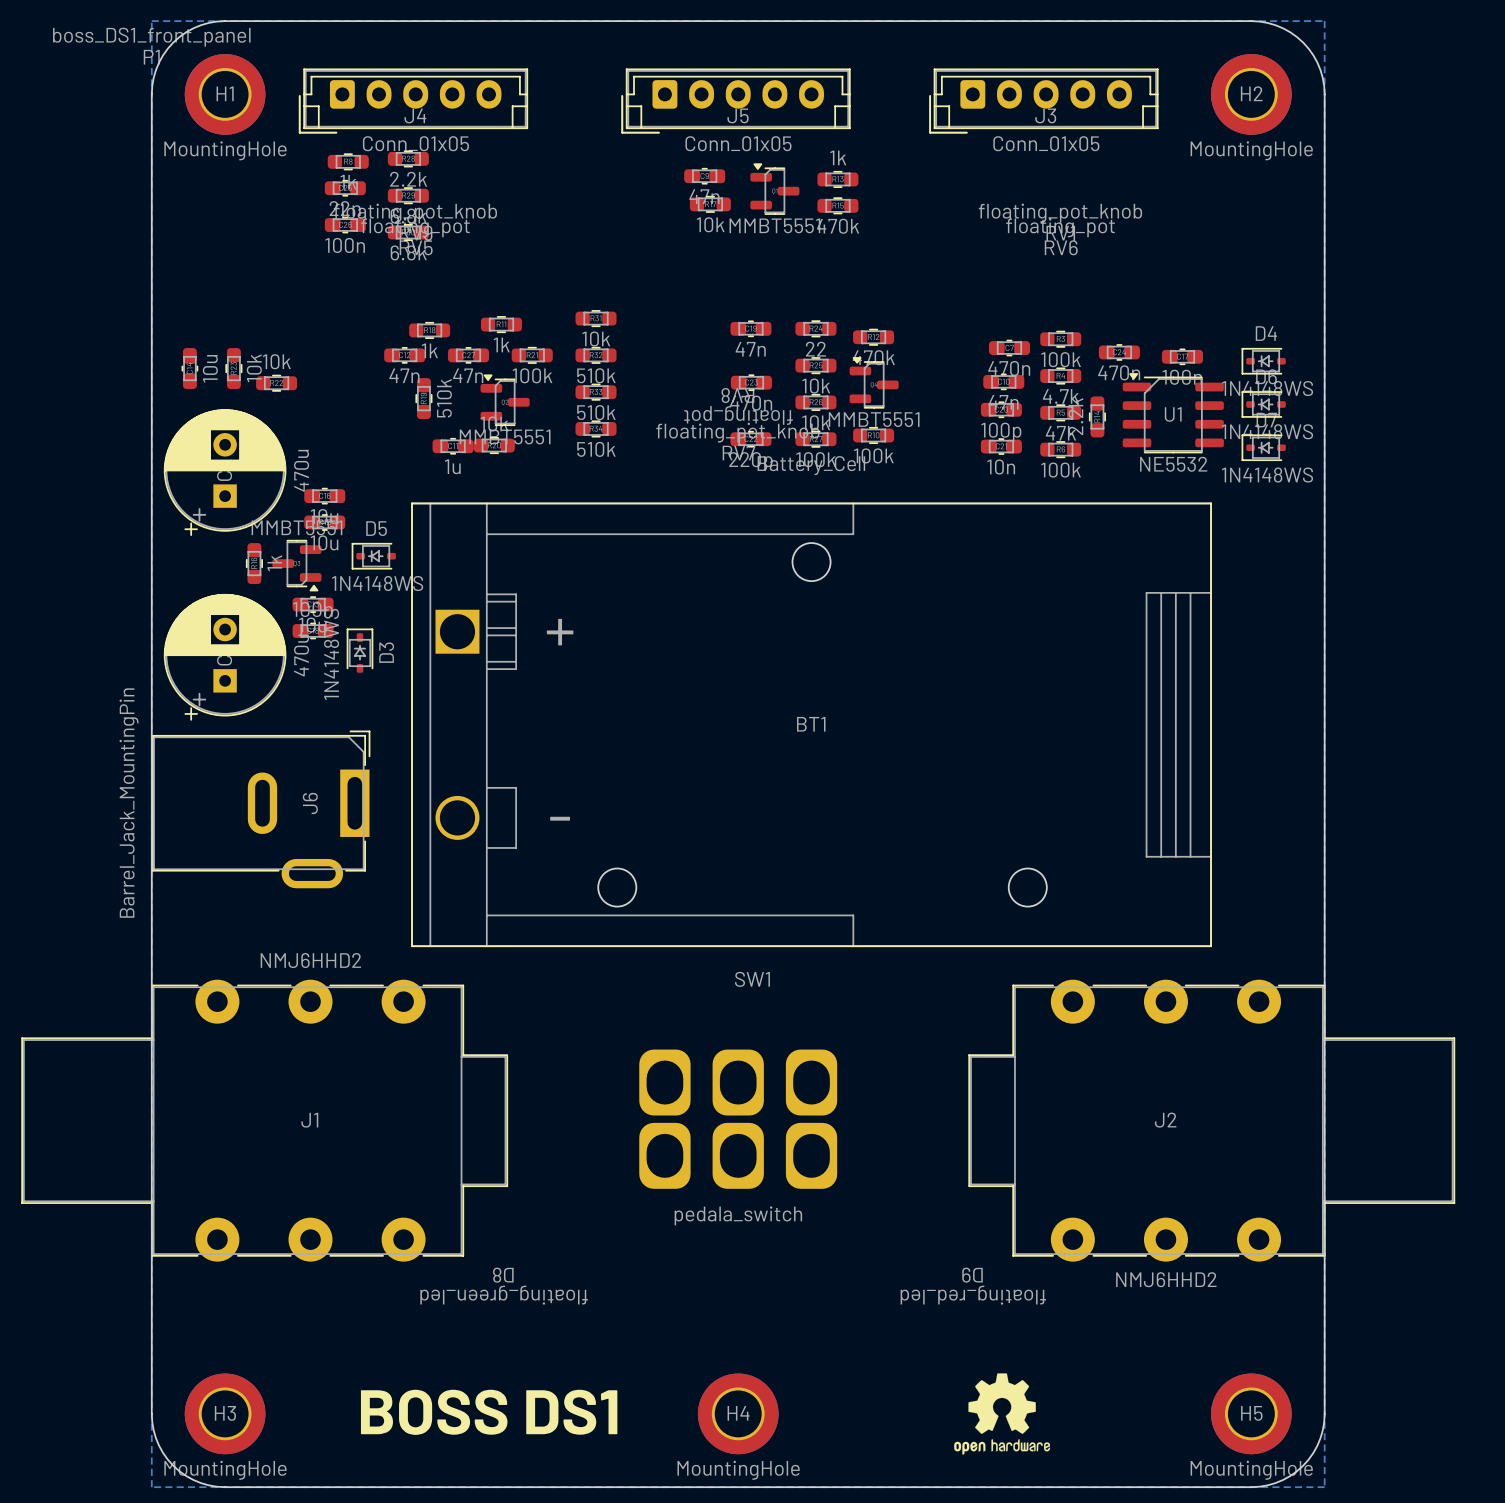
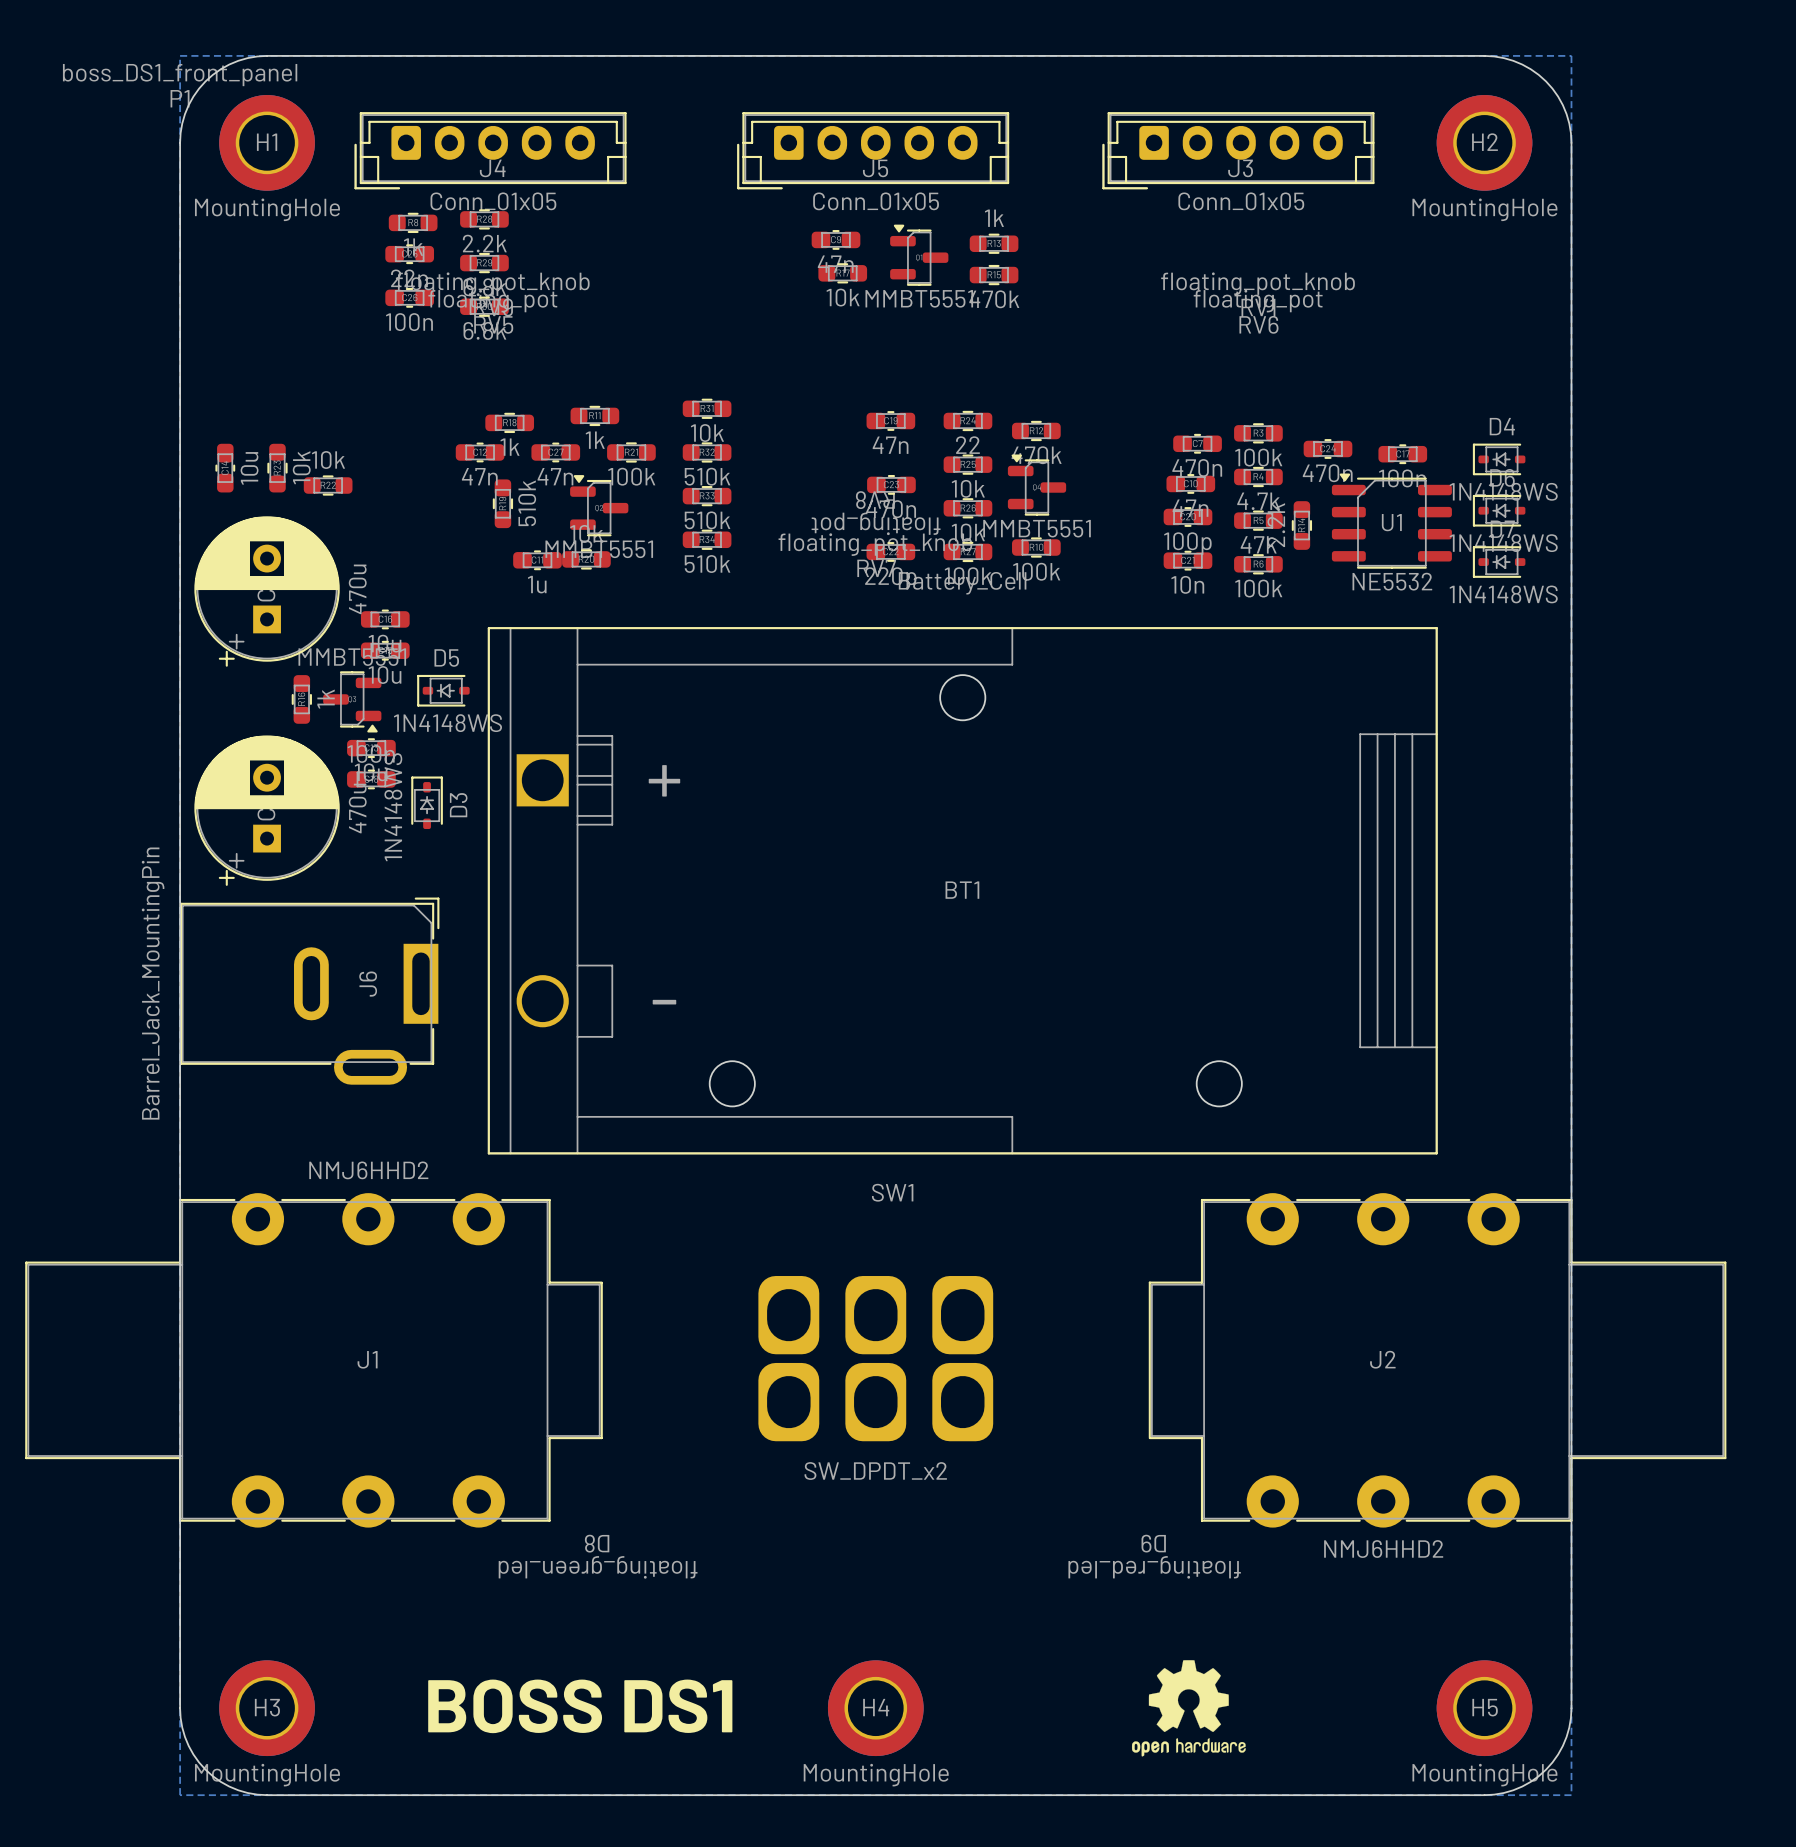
SW1 value: pedala_switch (738, 1215) -> SW_DPDT_x2 (875, 1471)

